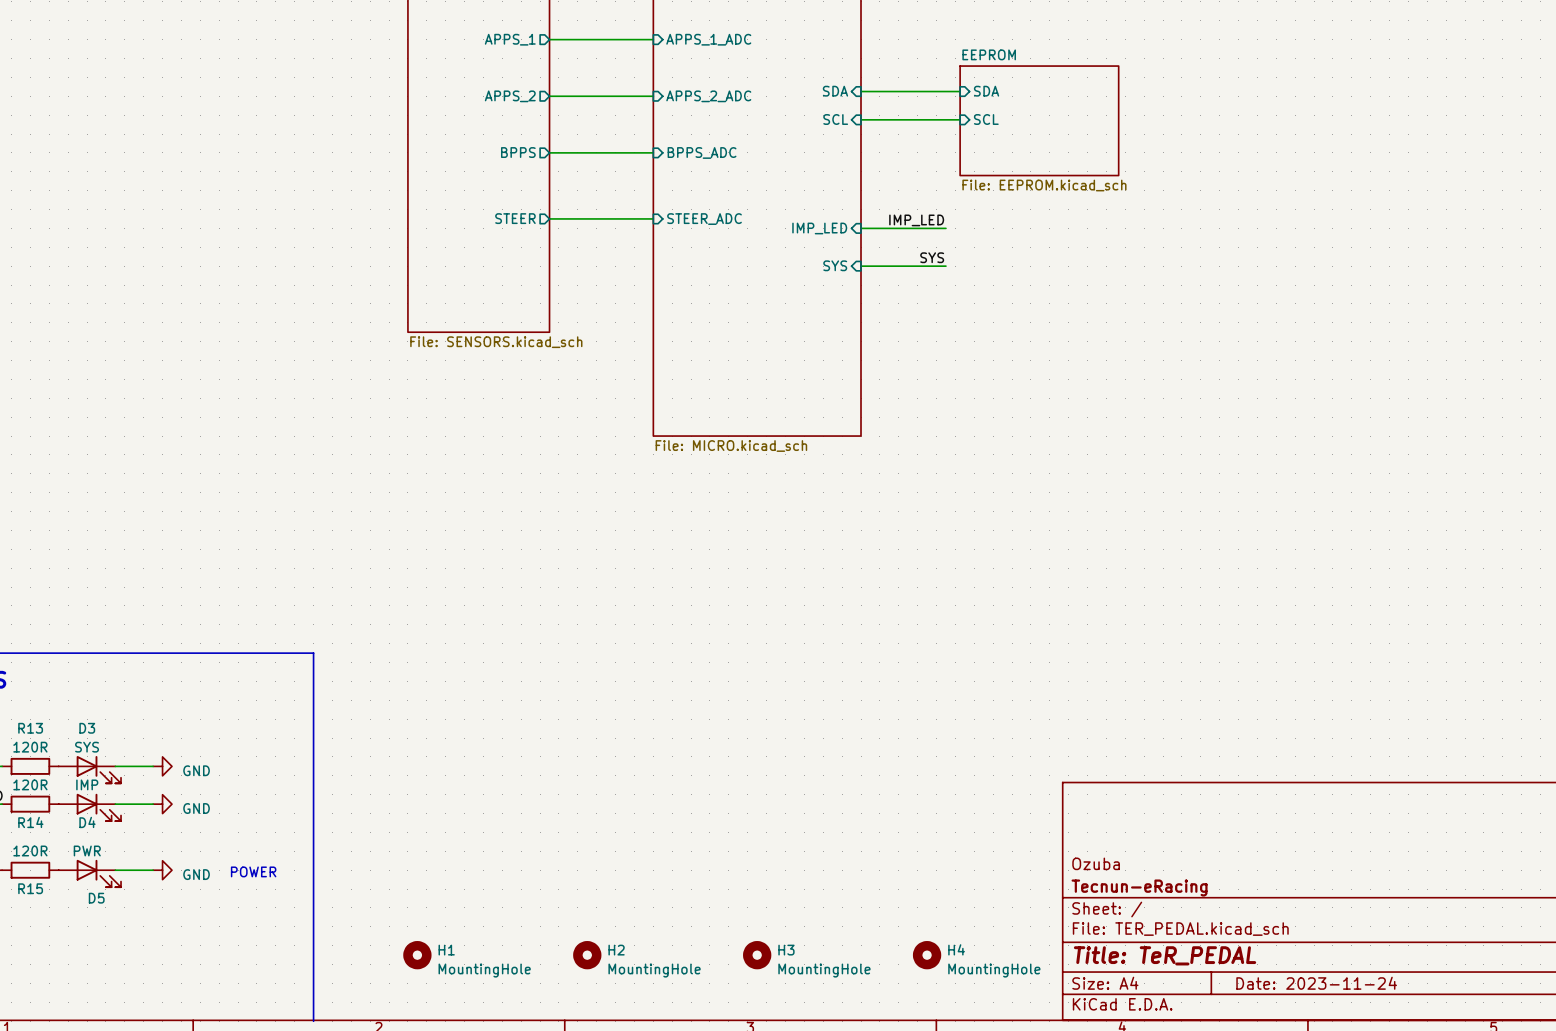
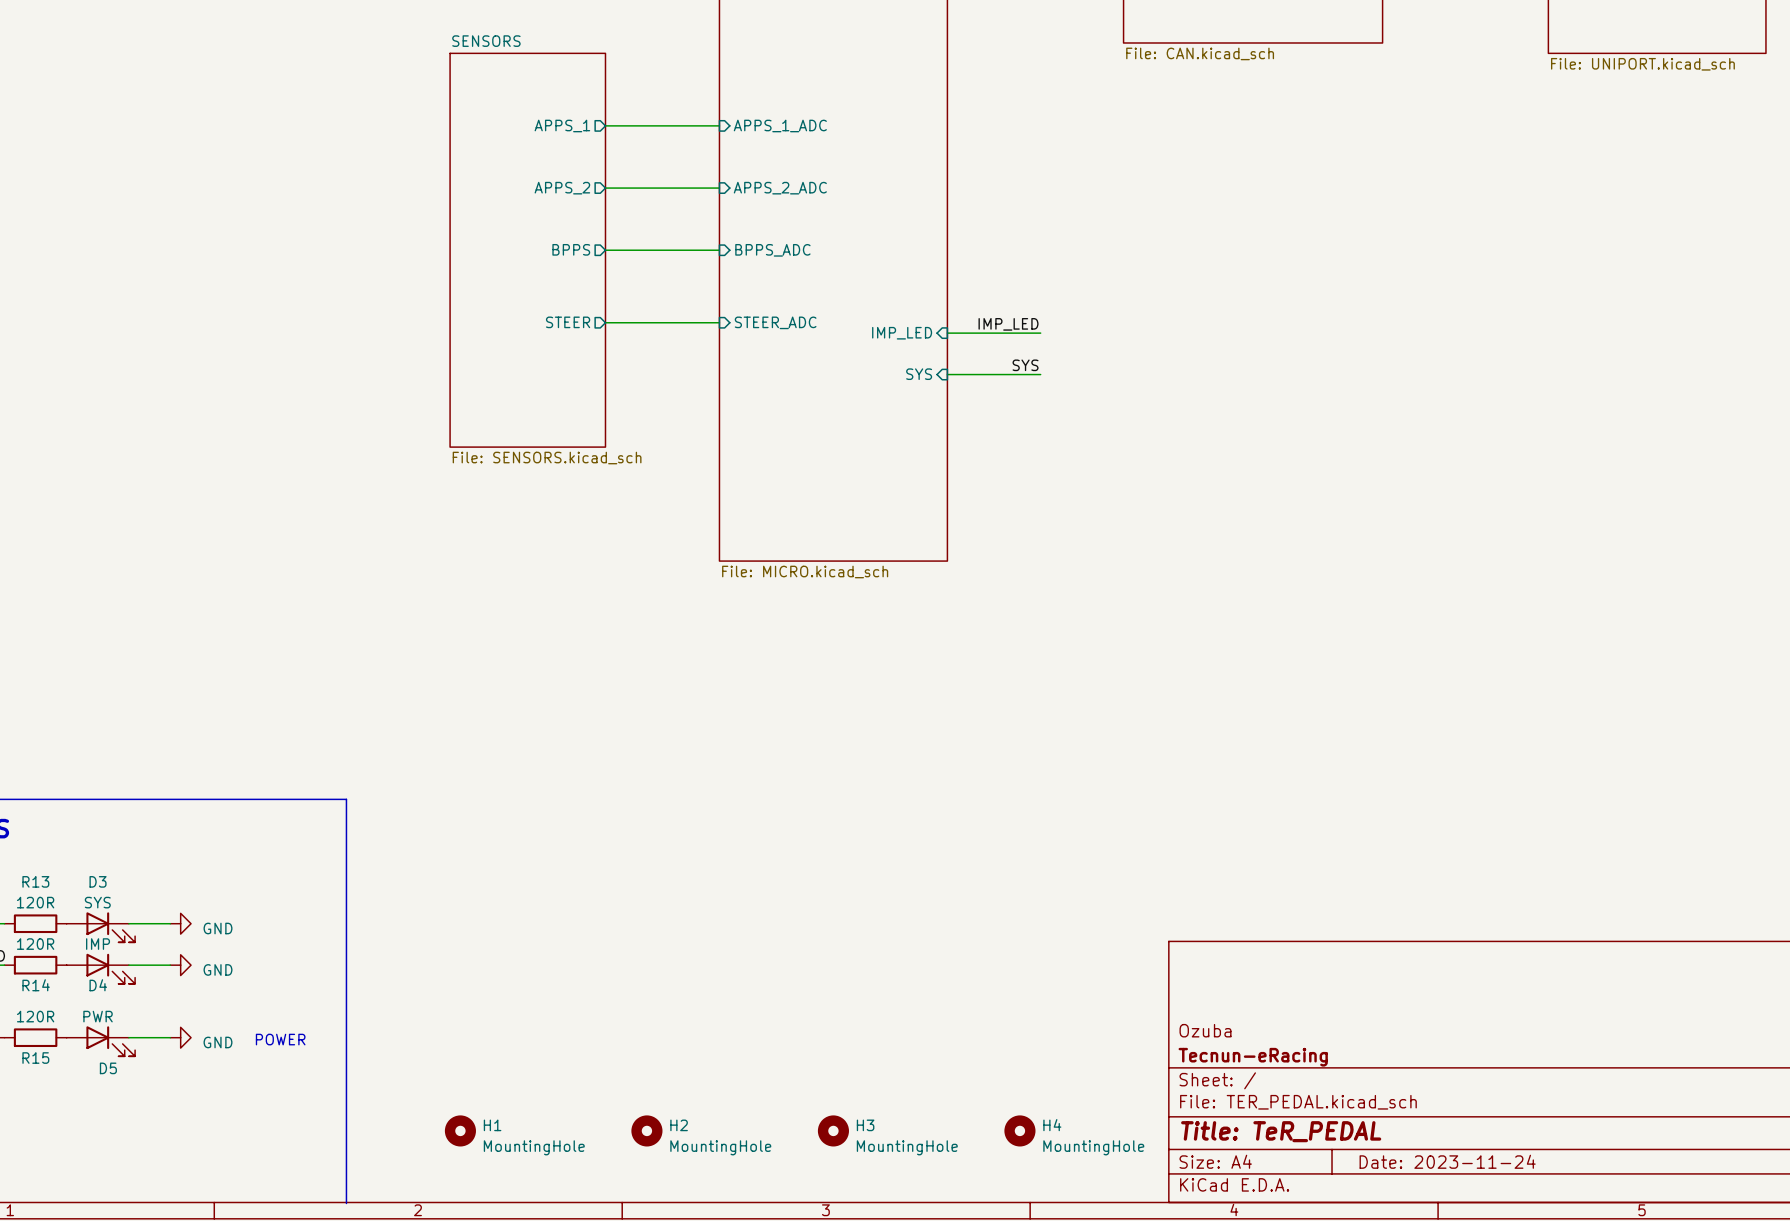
sheet pin: SDA (835, 91) -> none
wire: (861, 91) (960, 91) -> none
sheet pin: SDA (986, 91) -> none
sheet pin: SCL (835, 119) -> none
wire: (861, 119) (960, 119) -> none
sheet pin: SCL (986, 119) -> none
sheet EEPROM: File: EEPROM.kicad_sch (1039, 120) -> none

